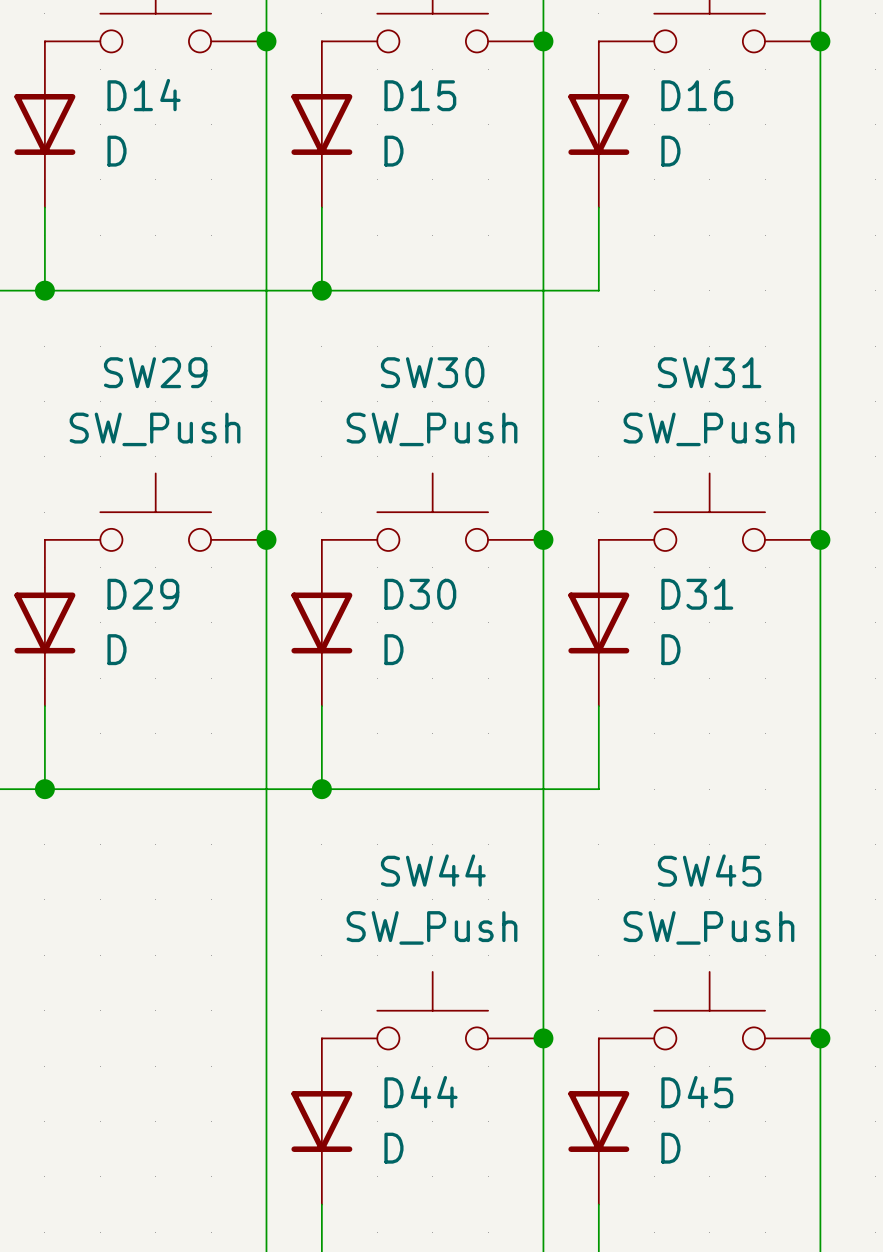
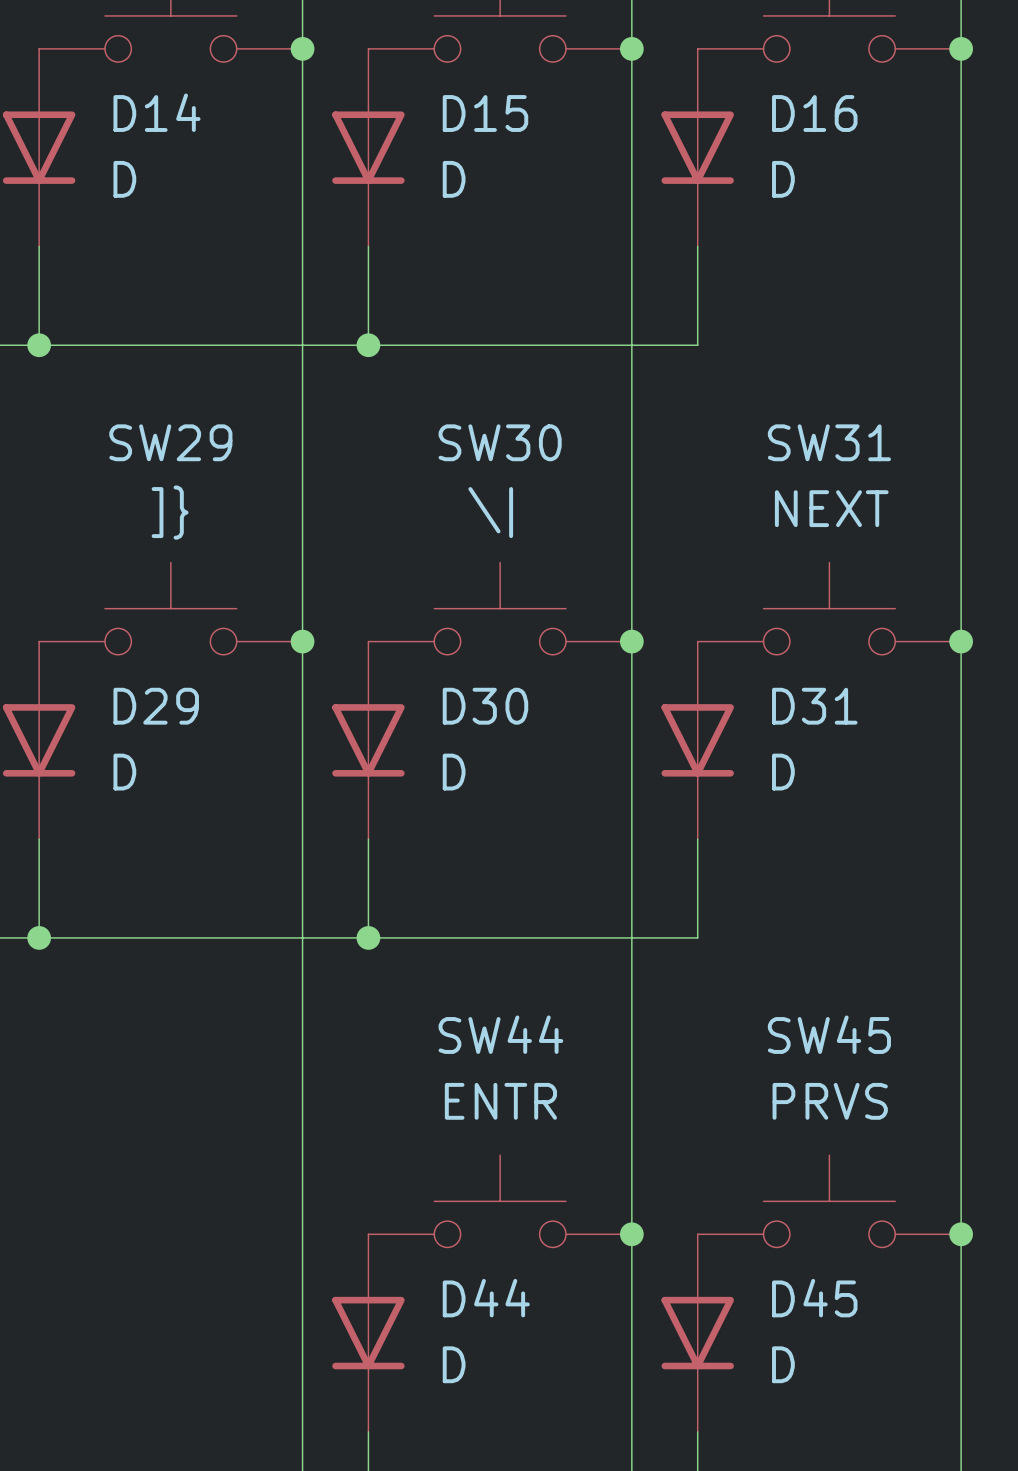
SW29 value: SW_Push (155, 429) -> ]} (170, 512)
SW30 value: SW_Push (432, 429) -> \| (490, 512)
SW31 value: SW_Push (708, 429) -> NEXT (831, 508)
SW44 value: SW_Push (432, 927) -> ENTR (500, 1101)
SW45 value: SW_Push (708, 927) -> PRVS (830, 1101)

